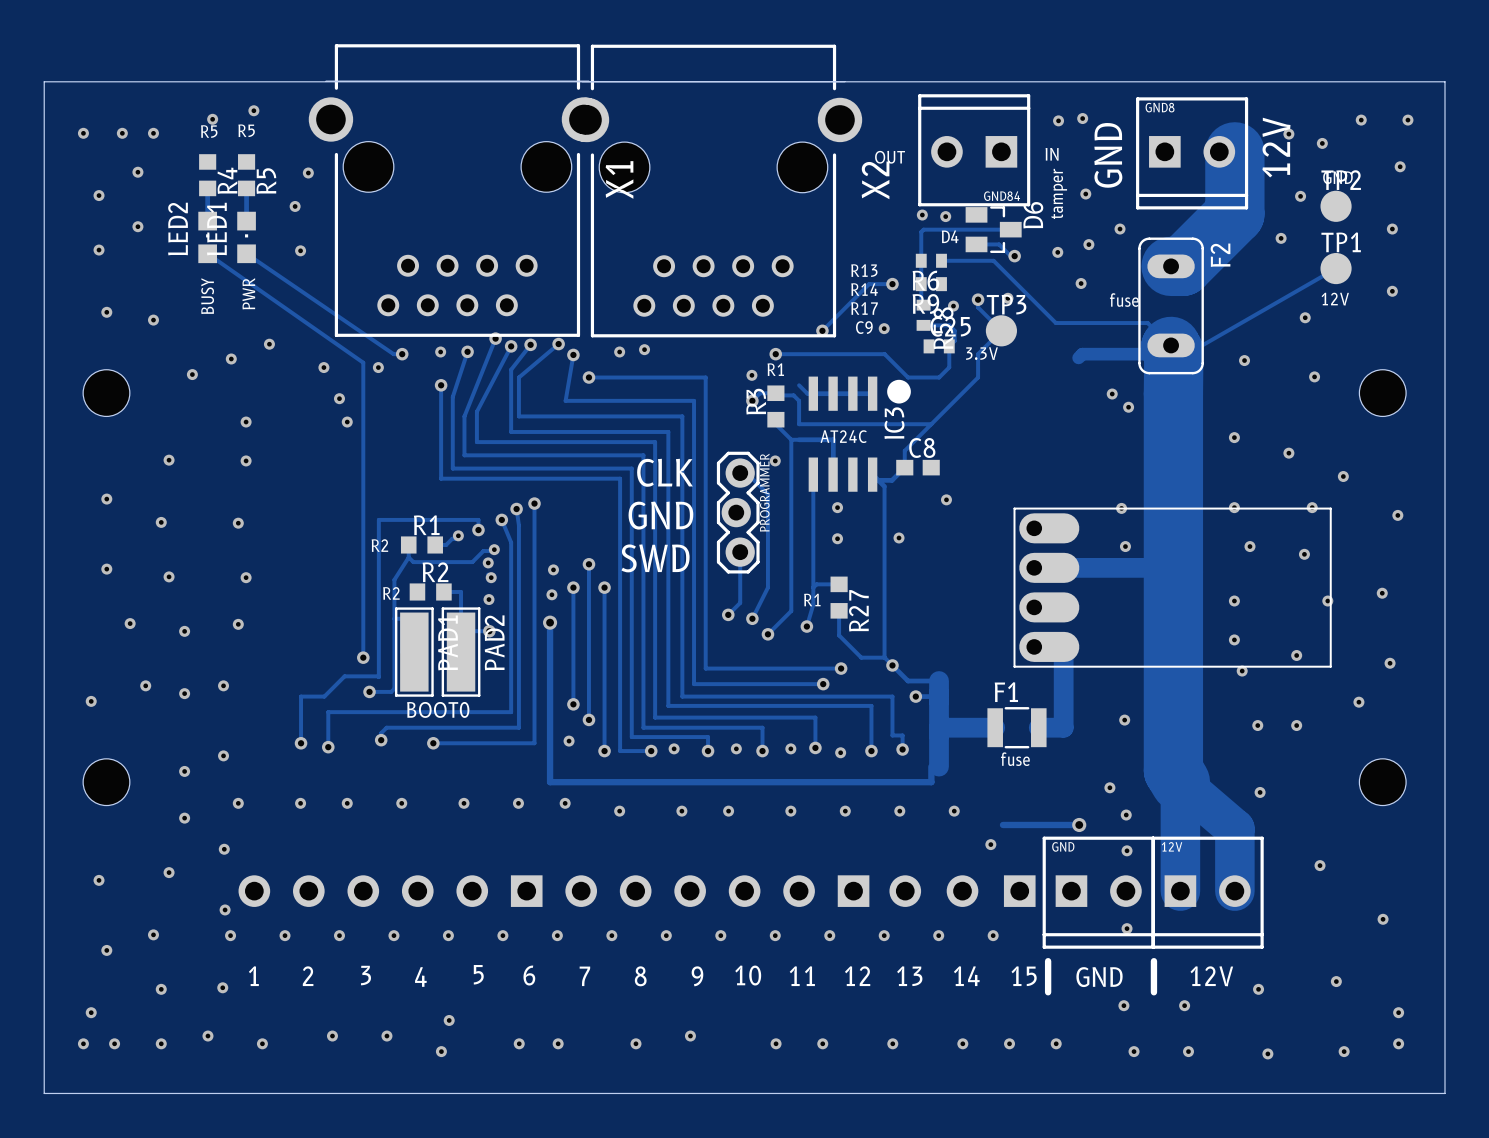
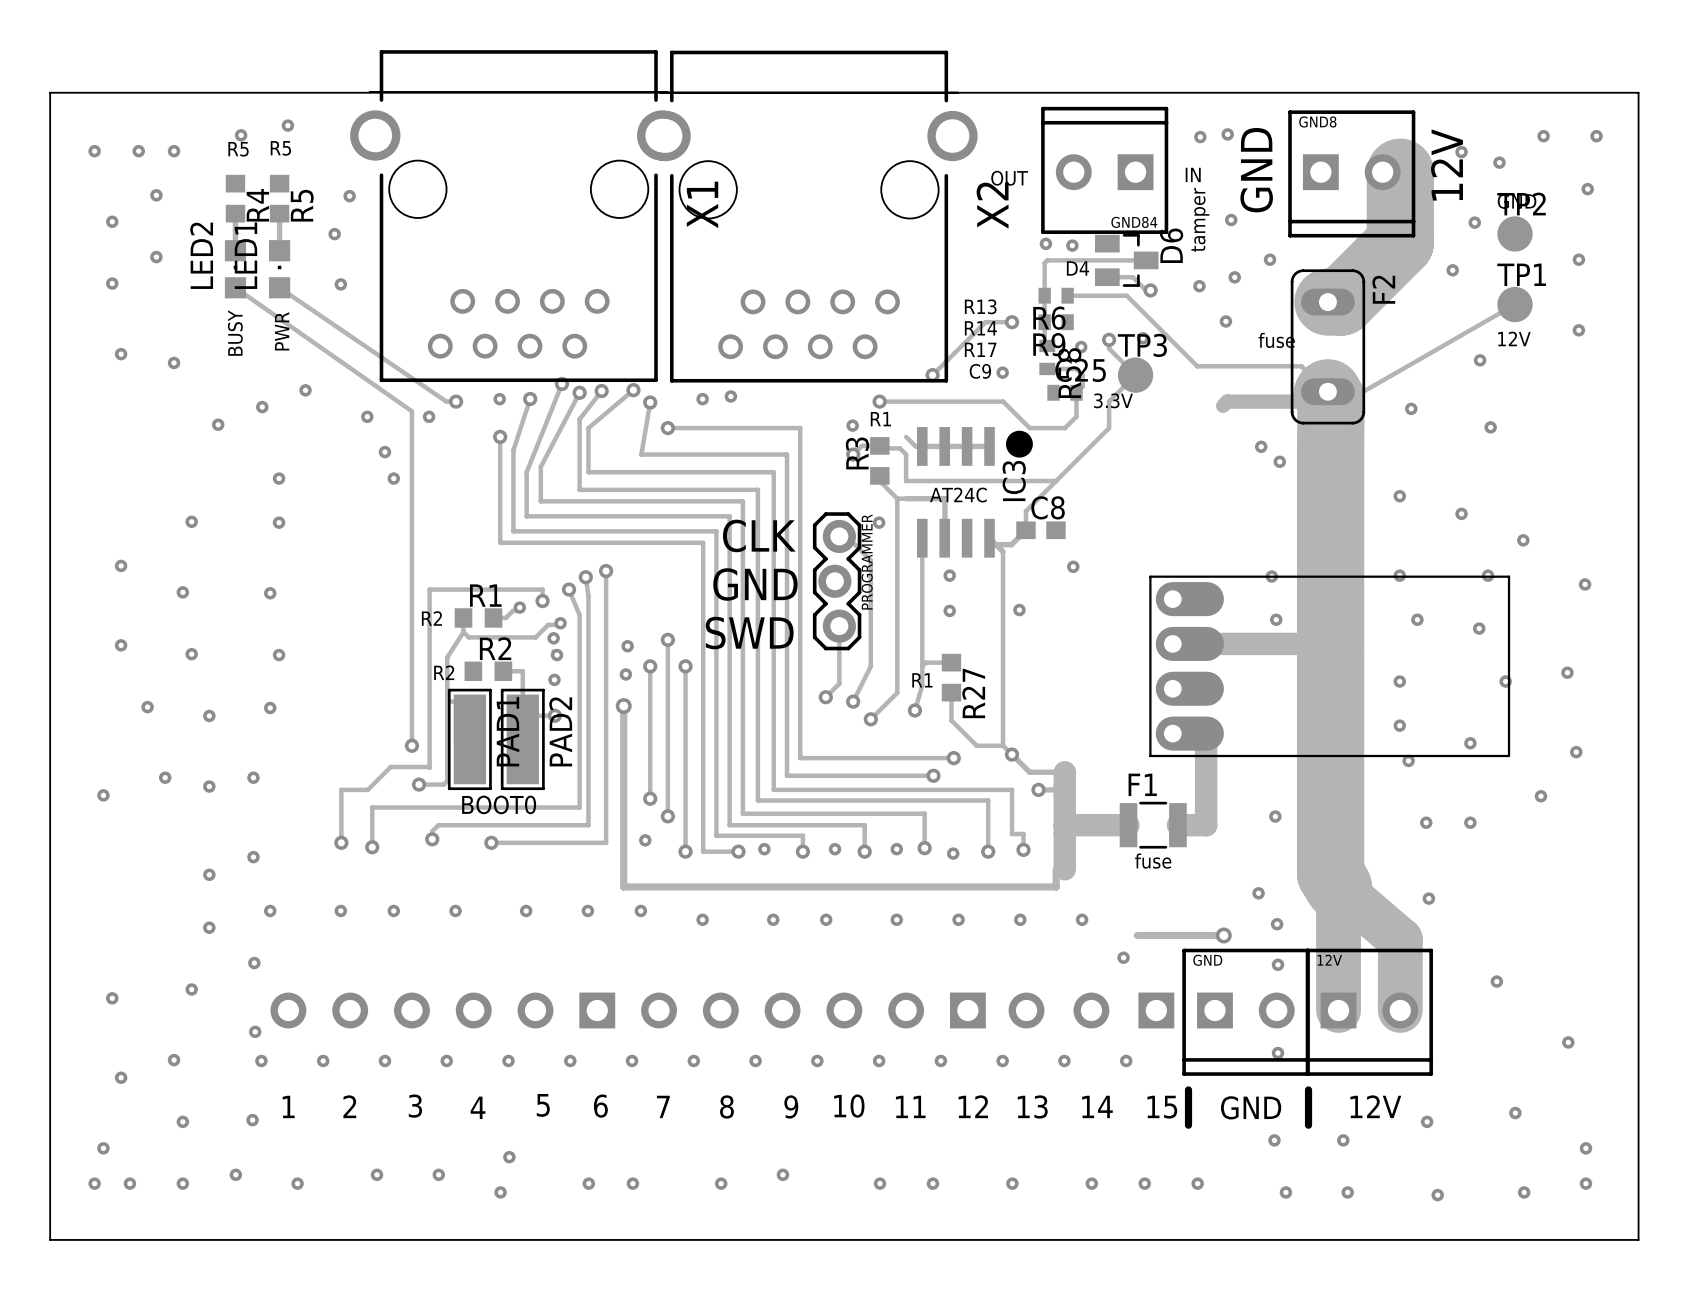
hole: (106, 393) -> none
hole: (1382, 393) -> none
hole: (106, 782) -> none
hole: (1382, 782) -> none

